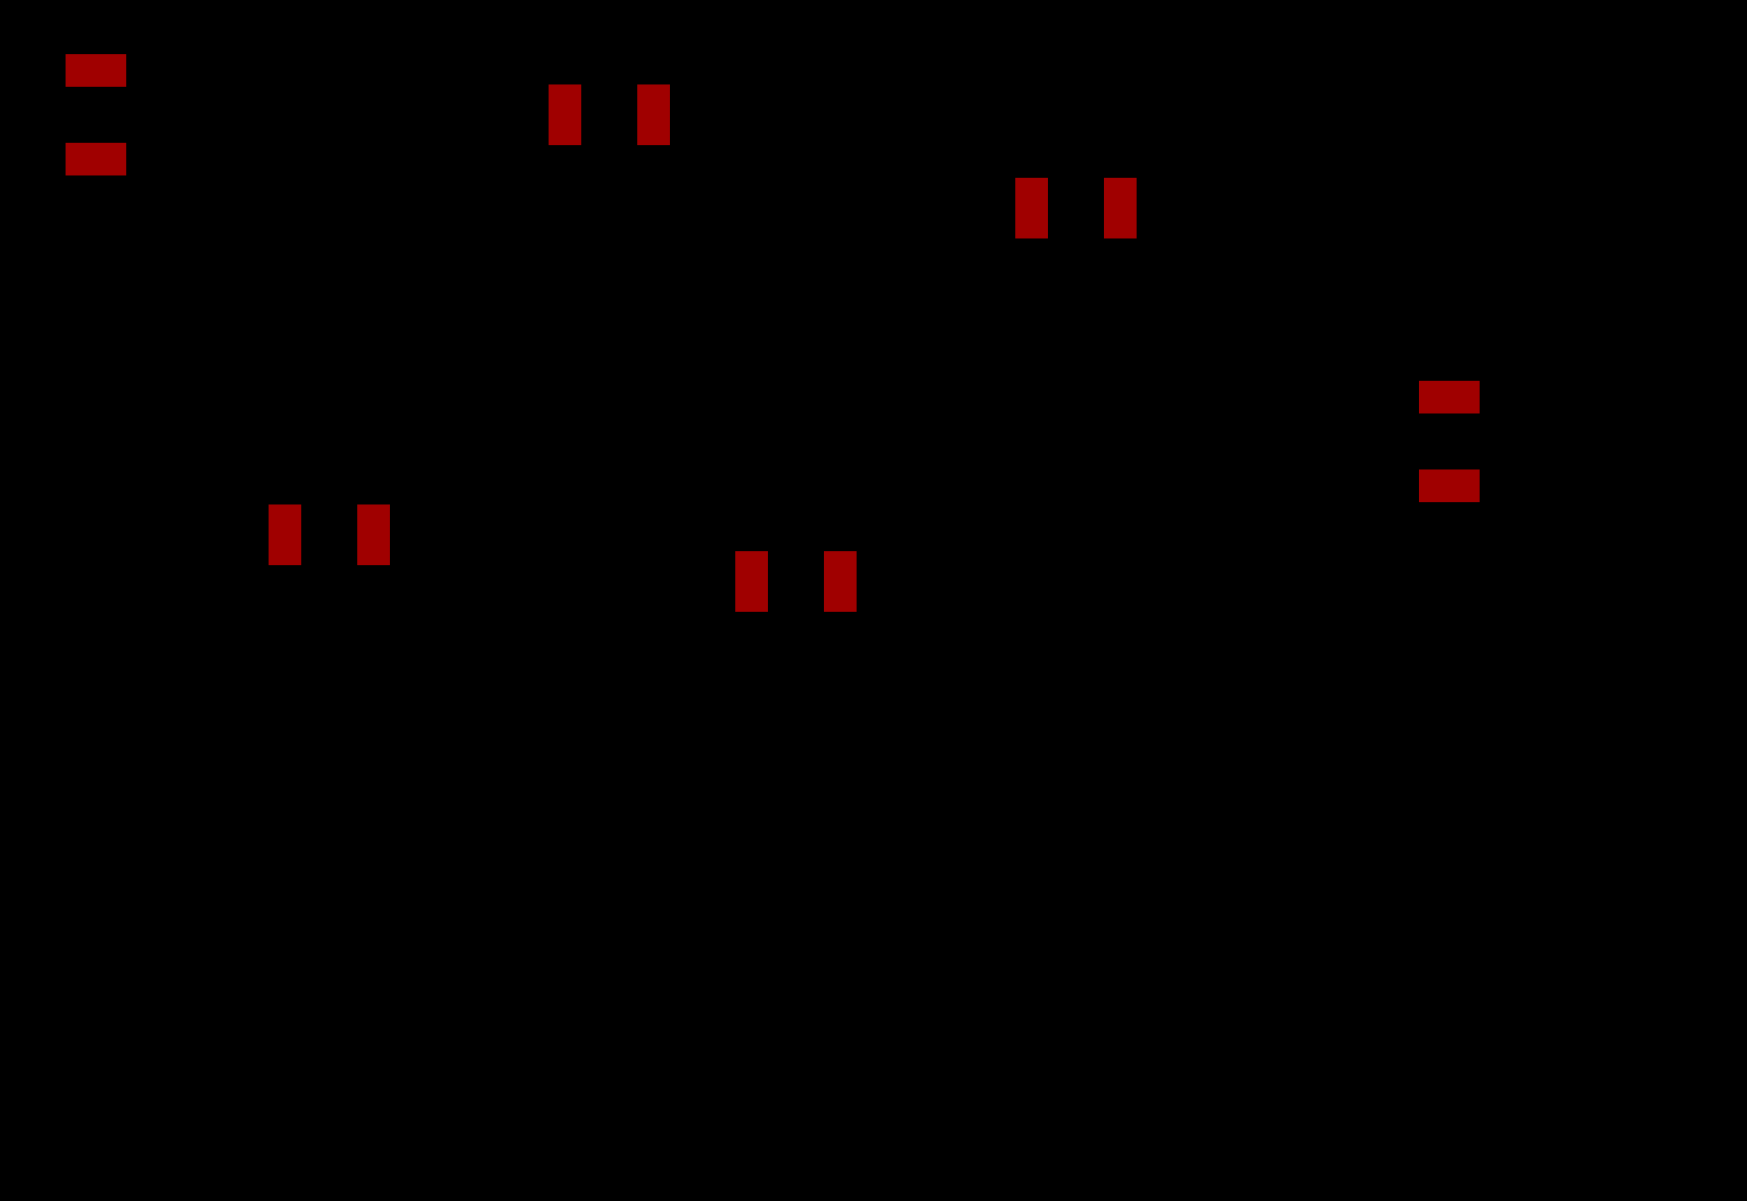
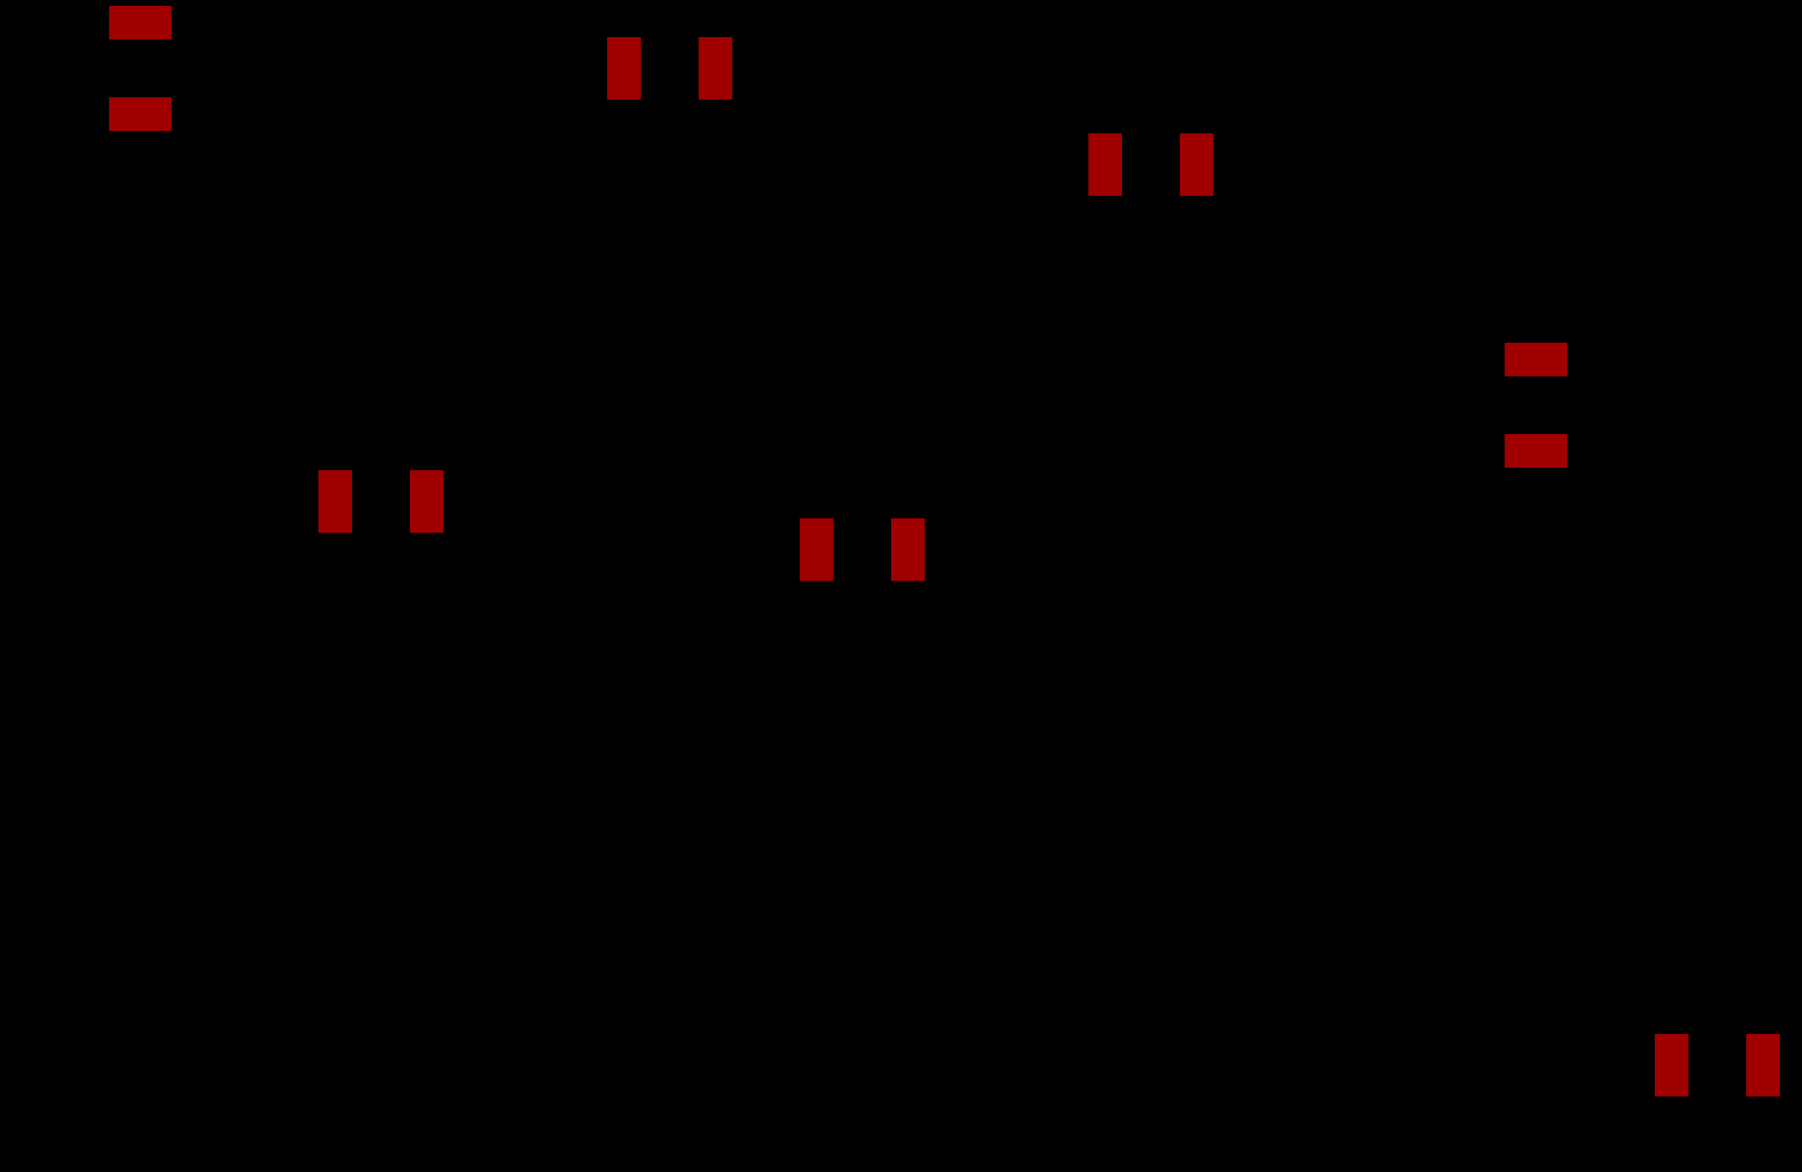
part: none -> (1717, 1065)

